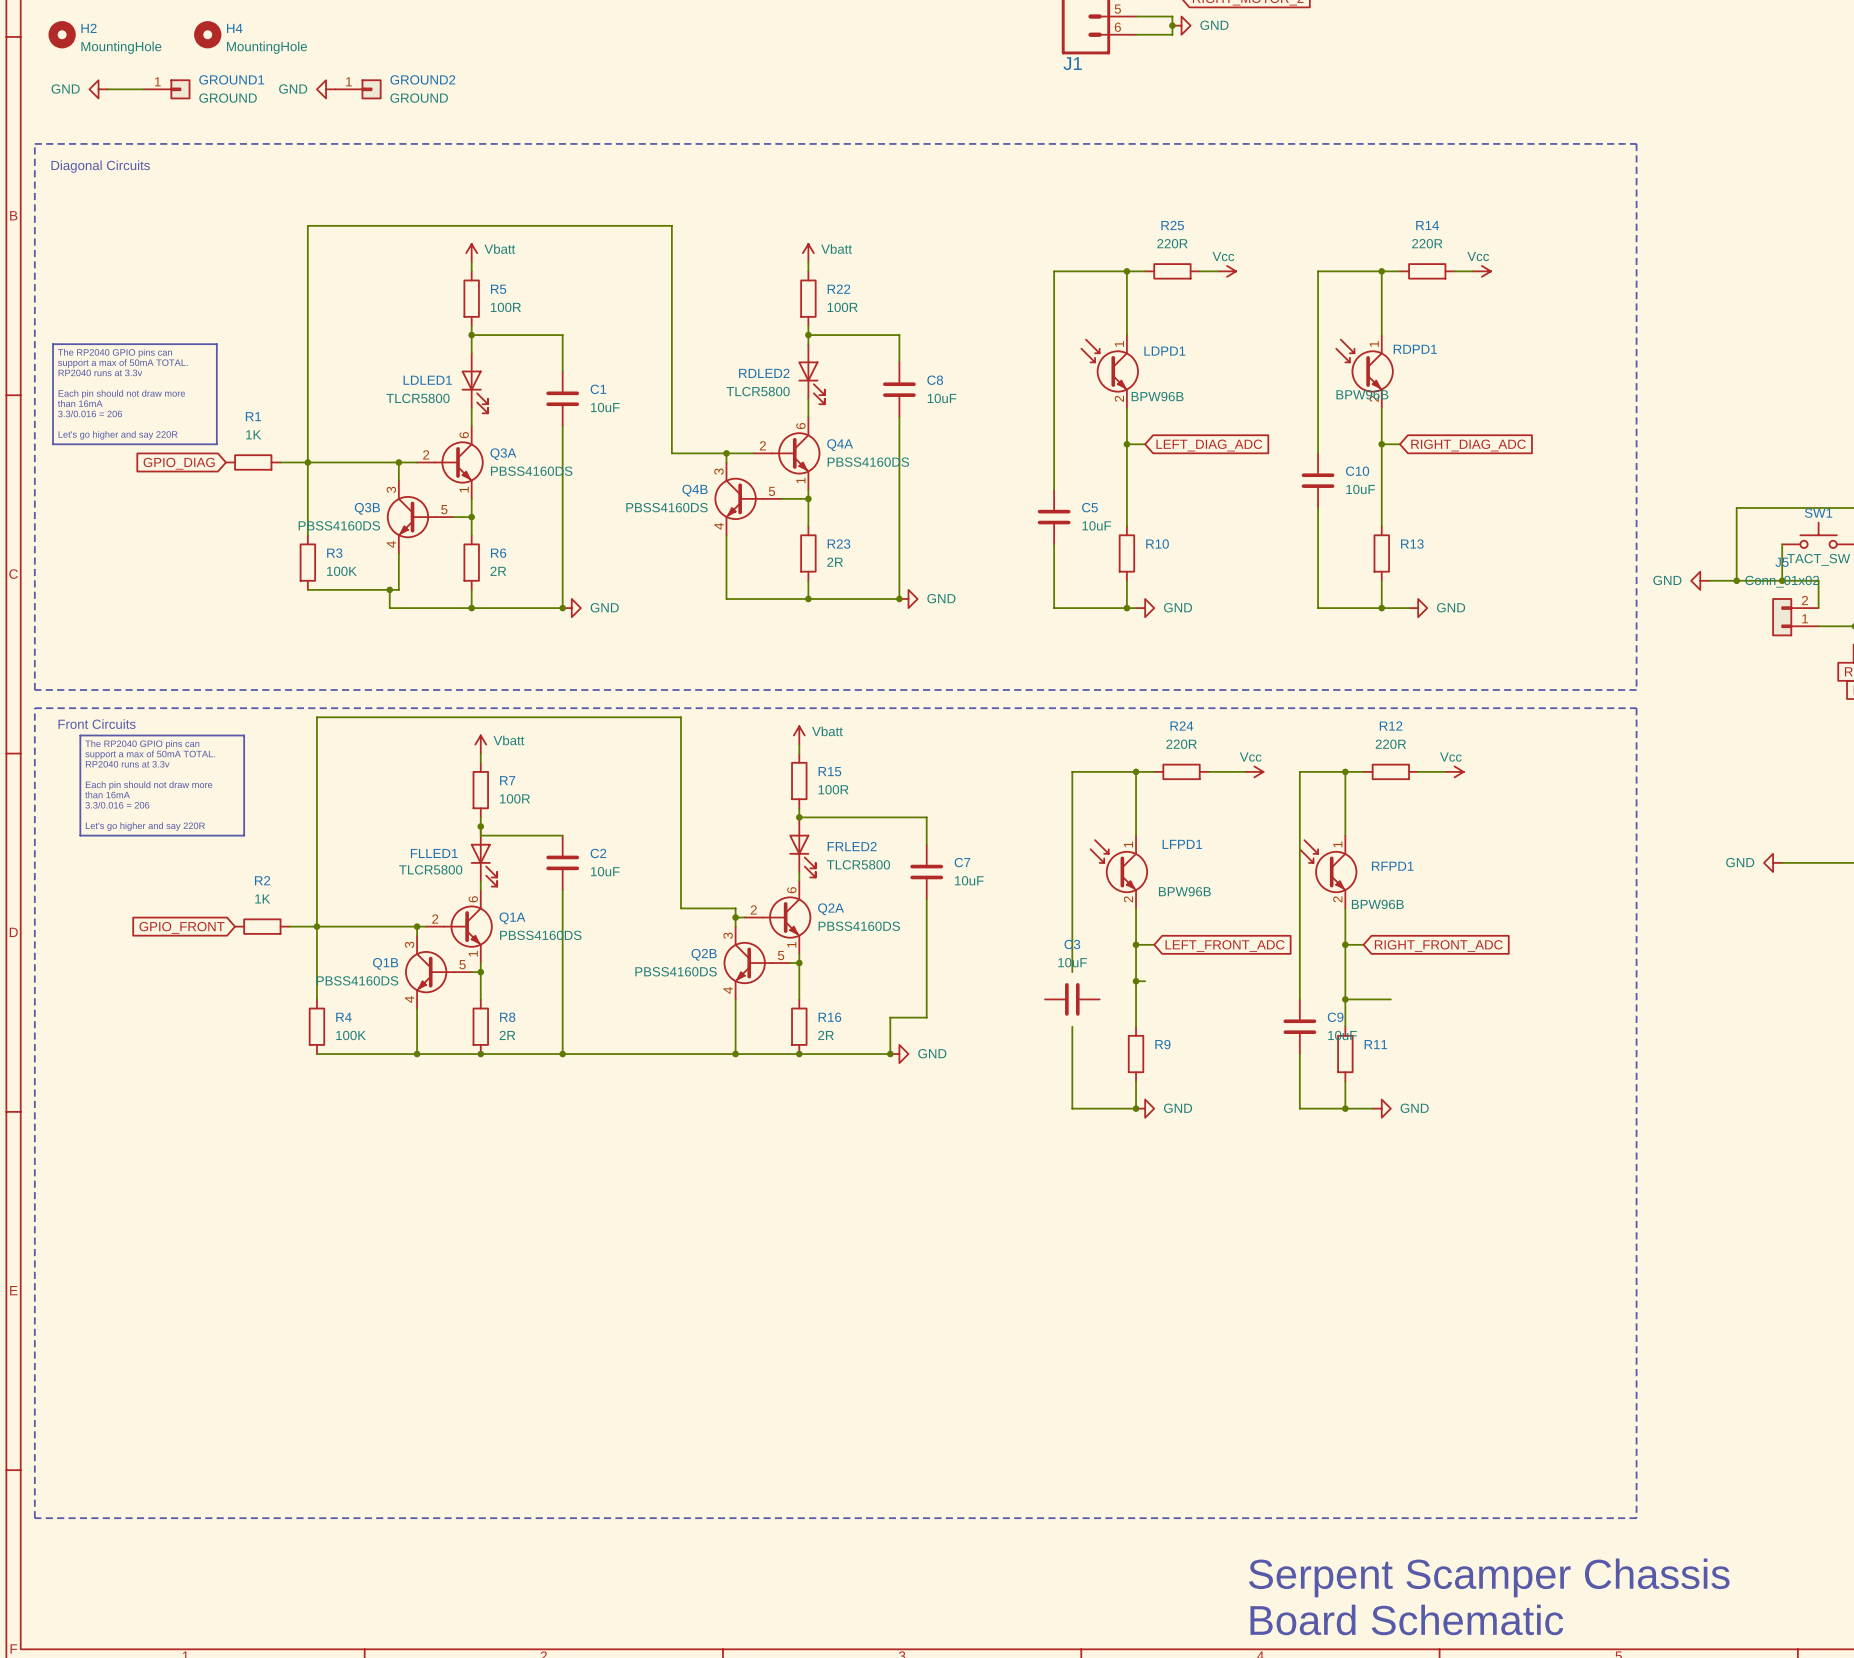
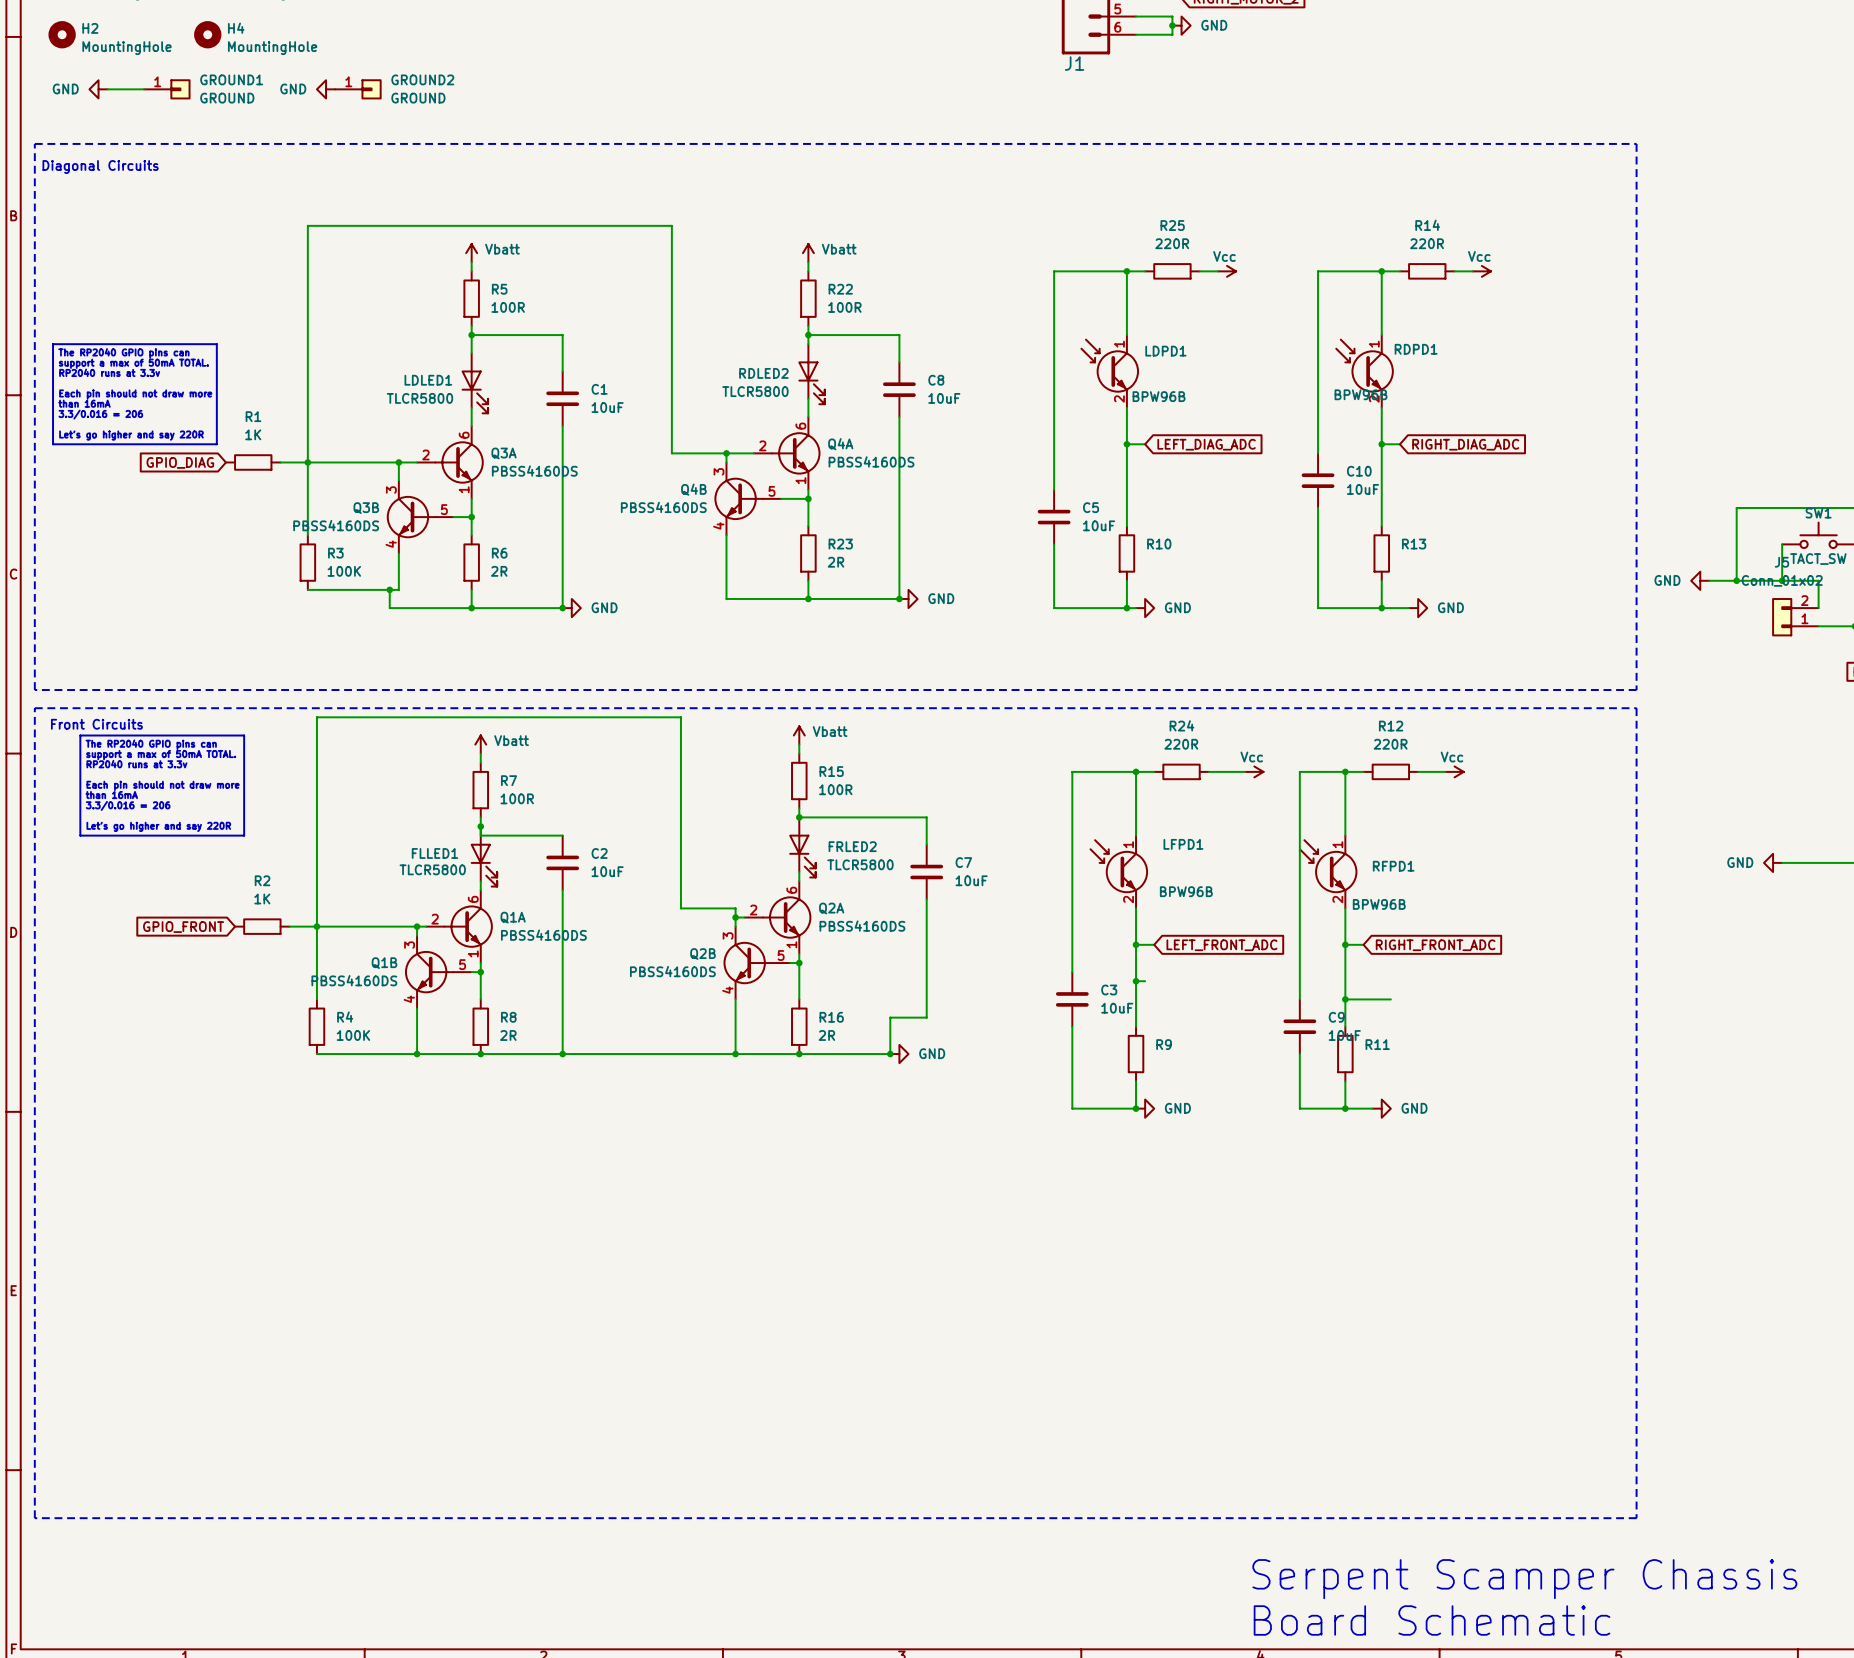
C3 name position: C3 (1072, 944) -> C3 (1109, 989)
C3 rotation: 0° (1072, 999) -> 90° clockwise (1072, 999)

